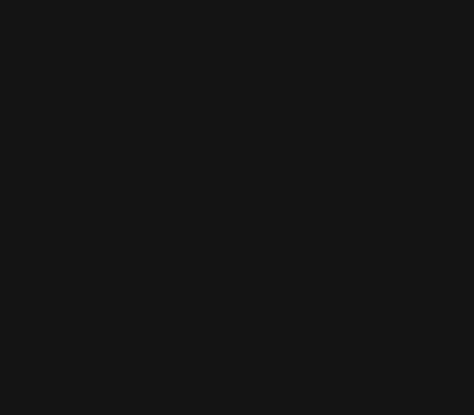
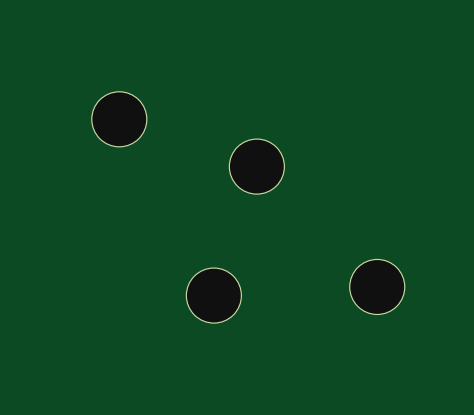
part: none -> (119, 119)
part: none -> (256, 166)
part: none -> (377, 286)
part: none -> (213, 295)

